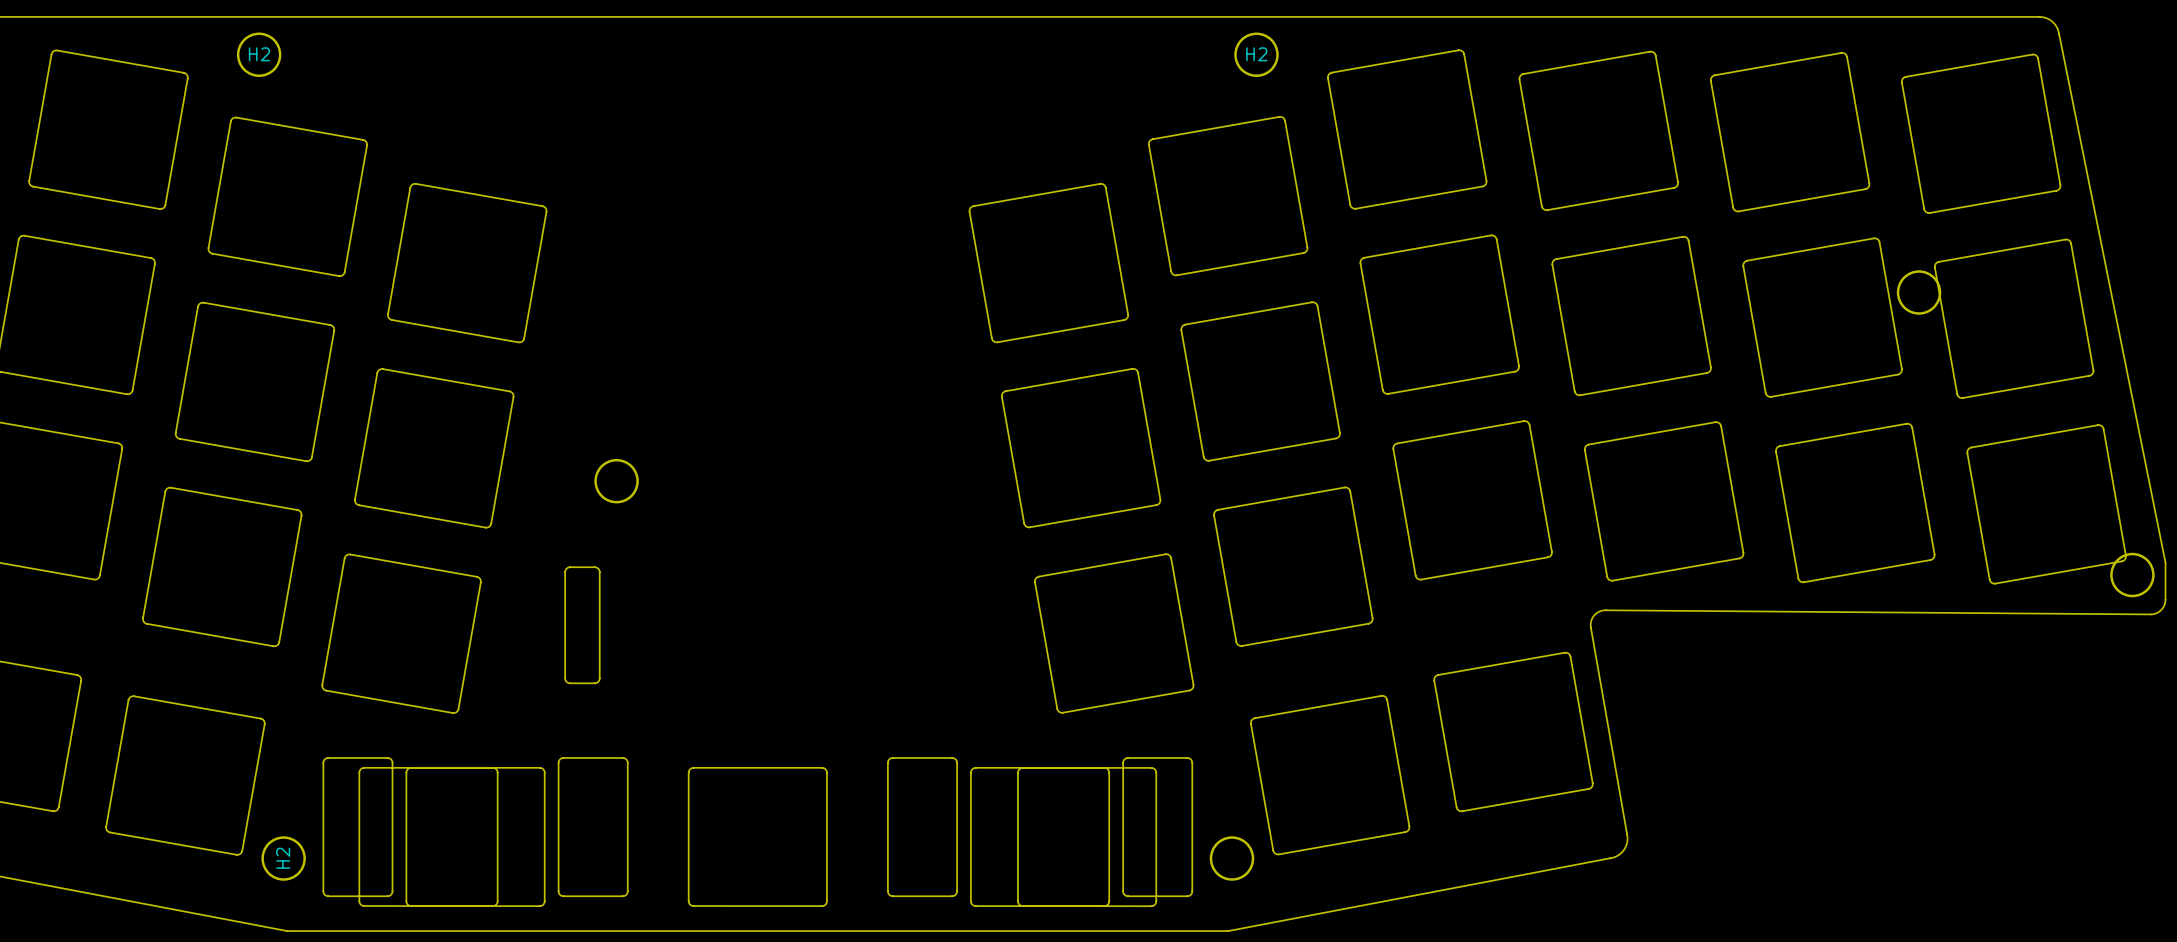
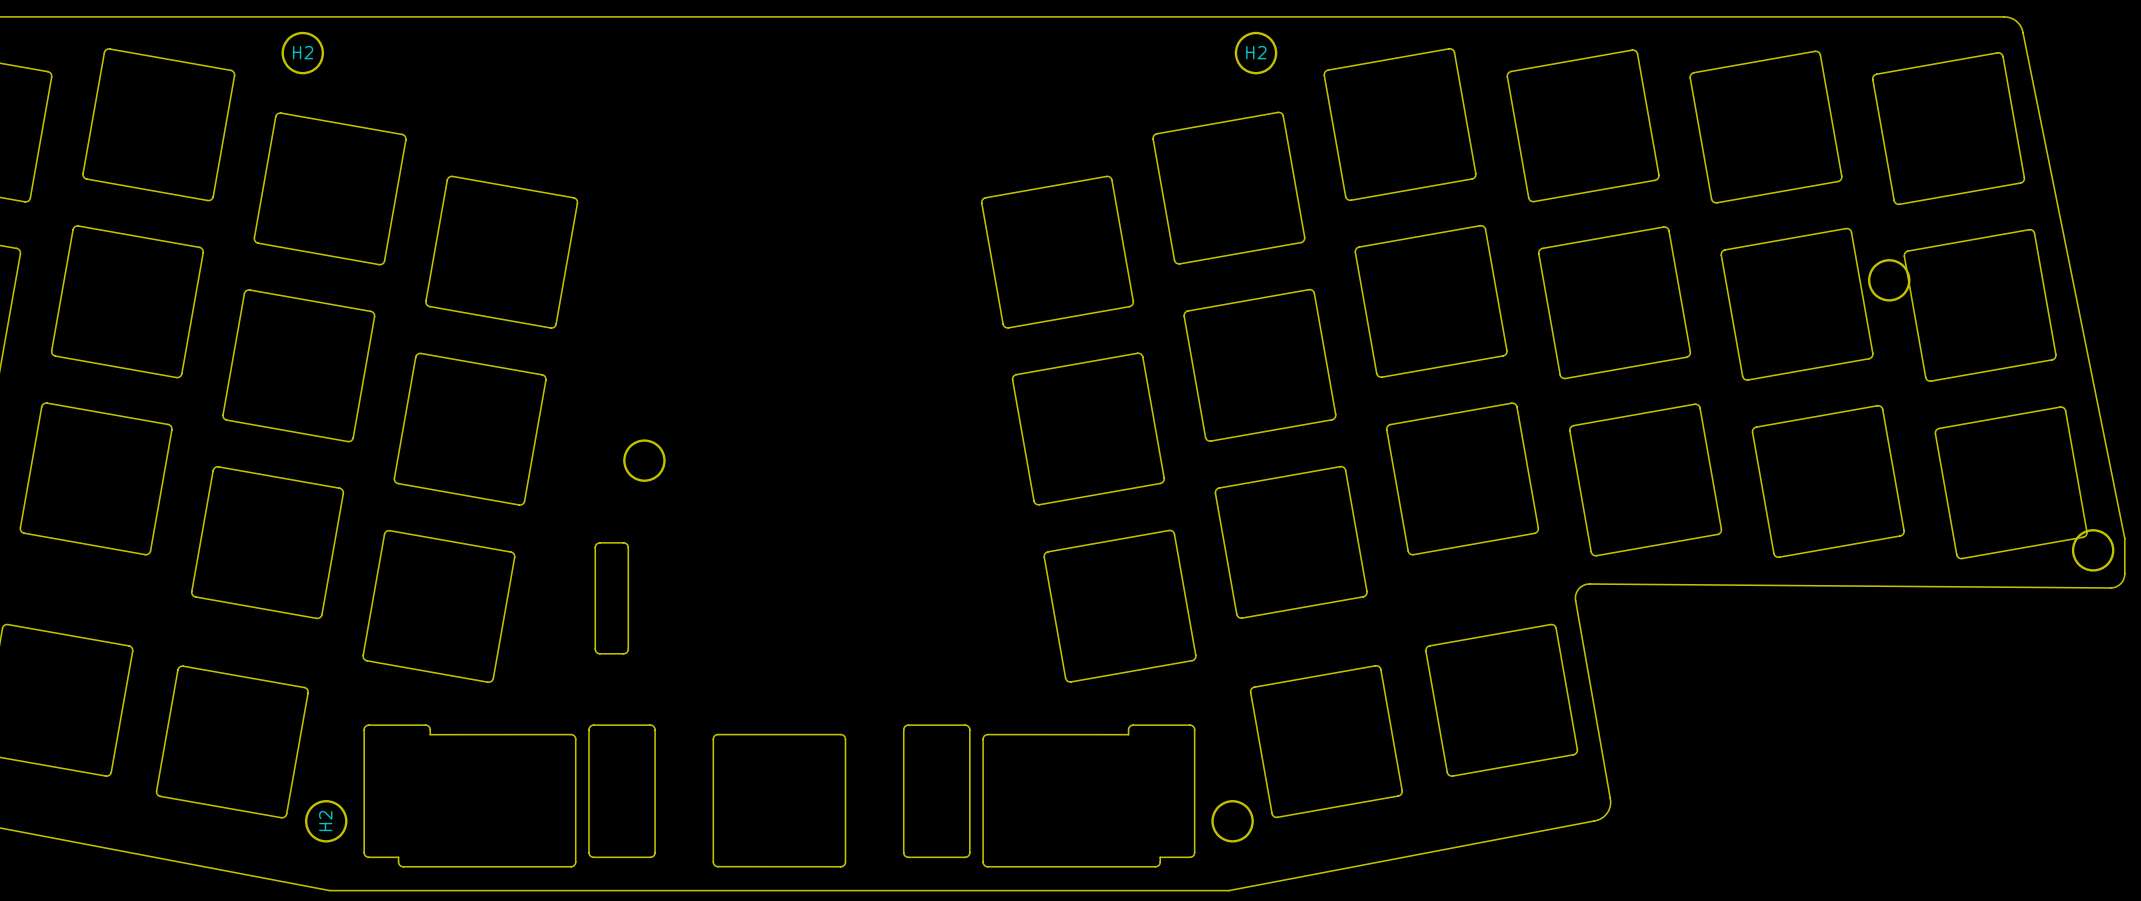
drawing shape: [323, 757, 628, 907] -> [364, 725, 656, 867]
drawing shape: [887, 757, 1193, 907] -> [903, 725, 1195, 867]
drawing: [359, 767, 498, 907] -> none
drawing: [1017, 767, 1157, 907] -> none

